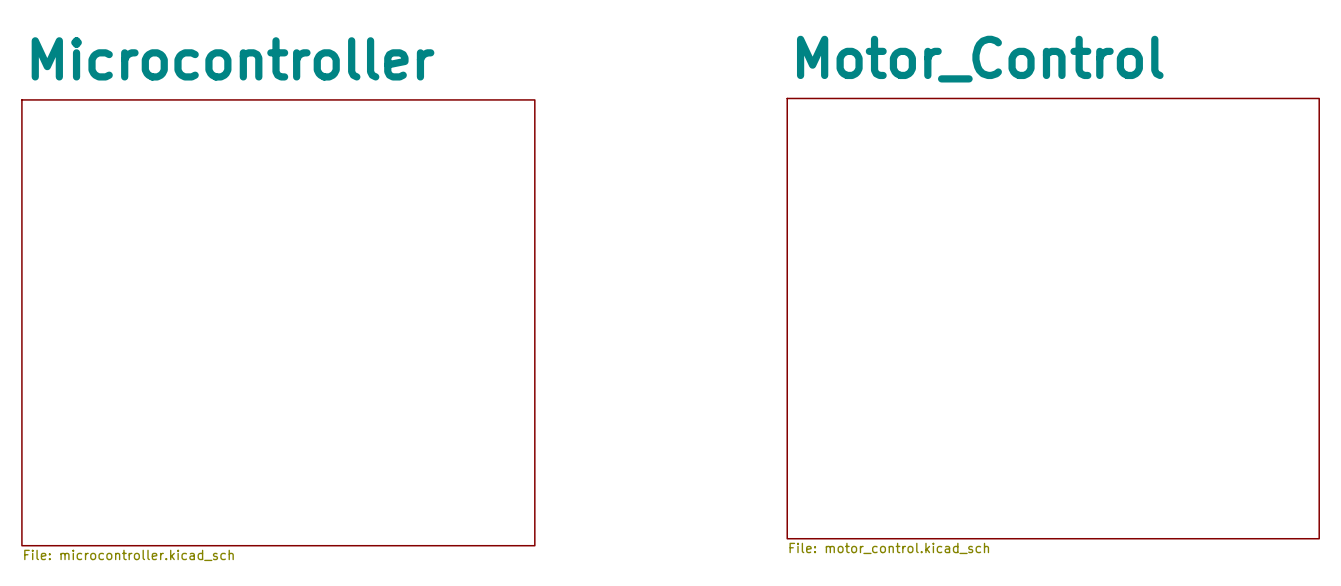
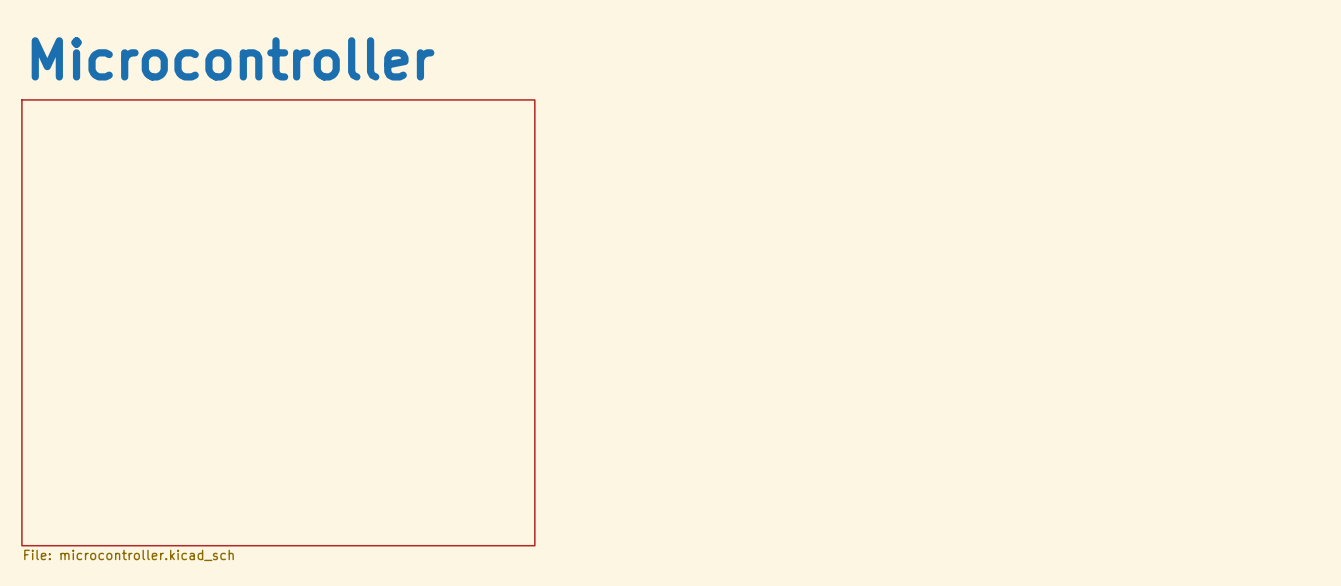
sheet Motor_Control: File: motor_control.kicad_sch (1053, 318) -> none

